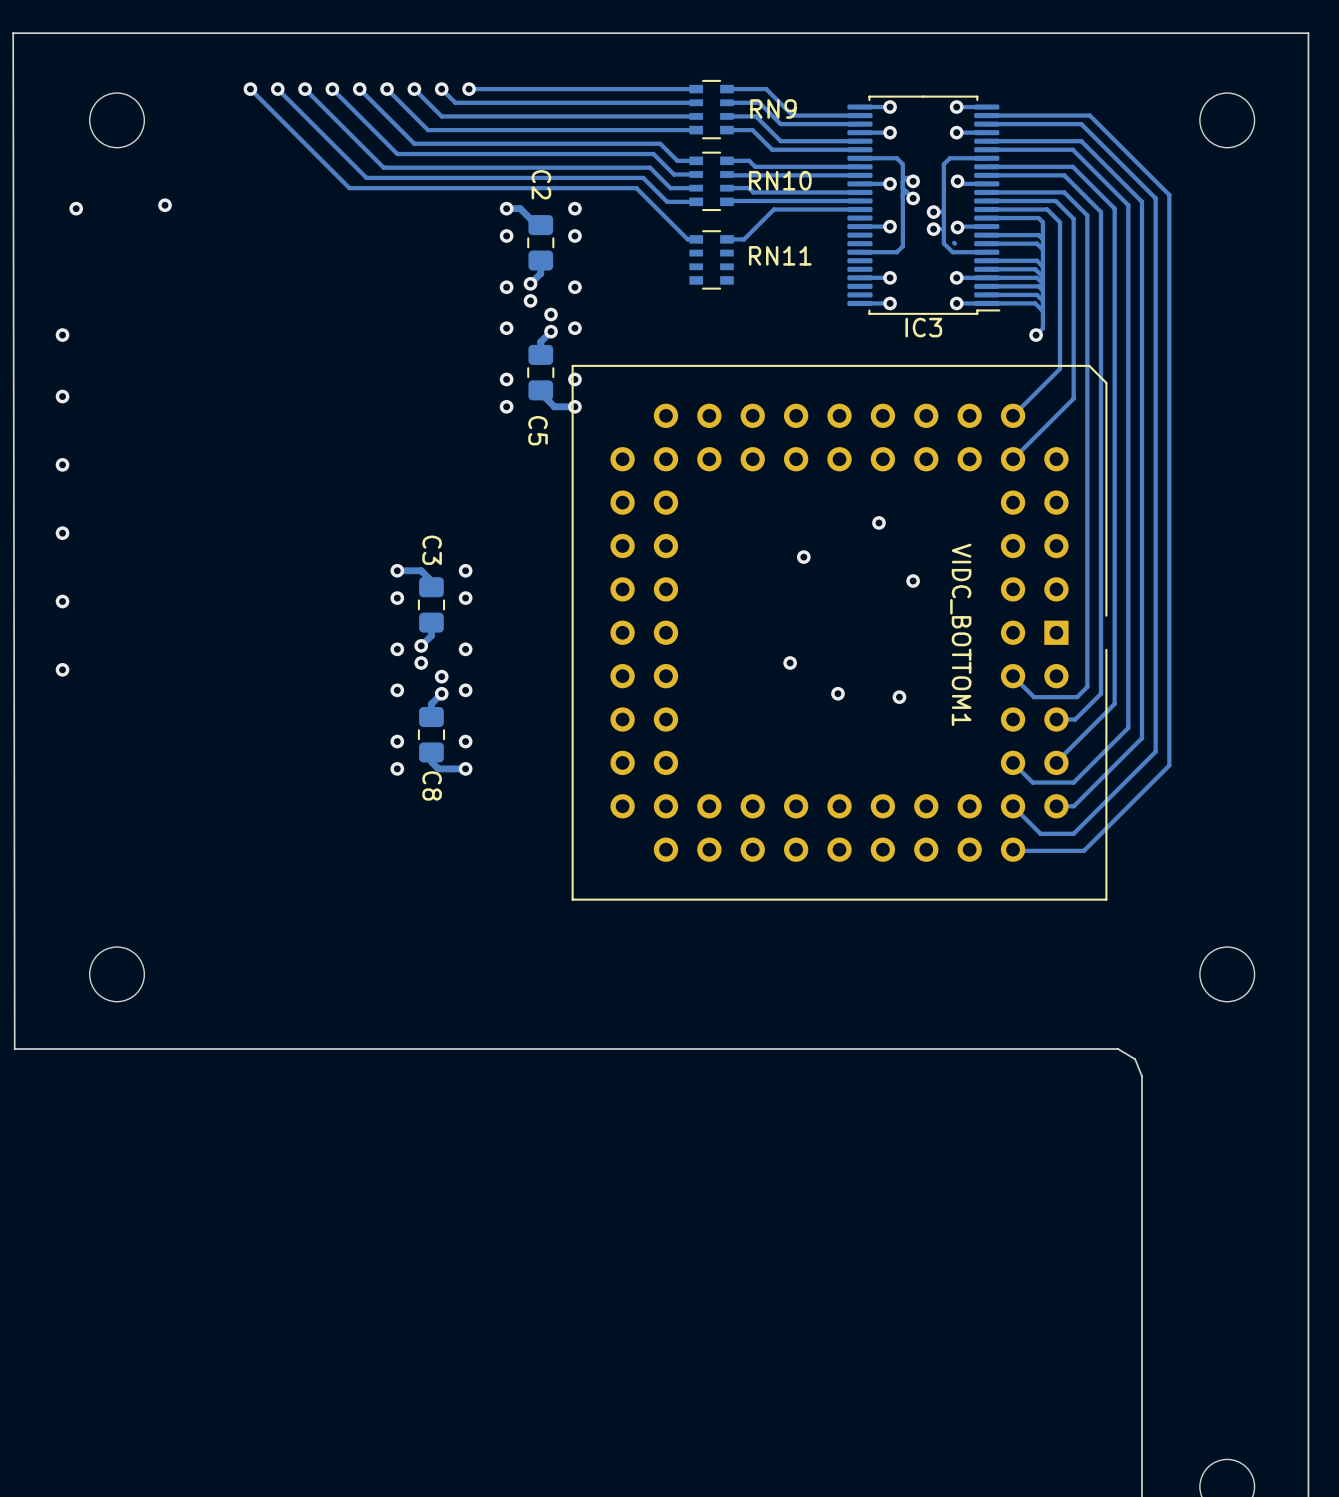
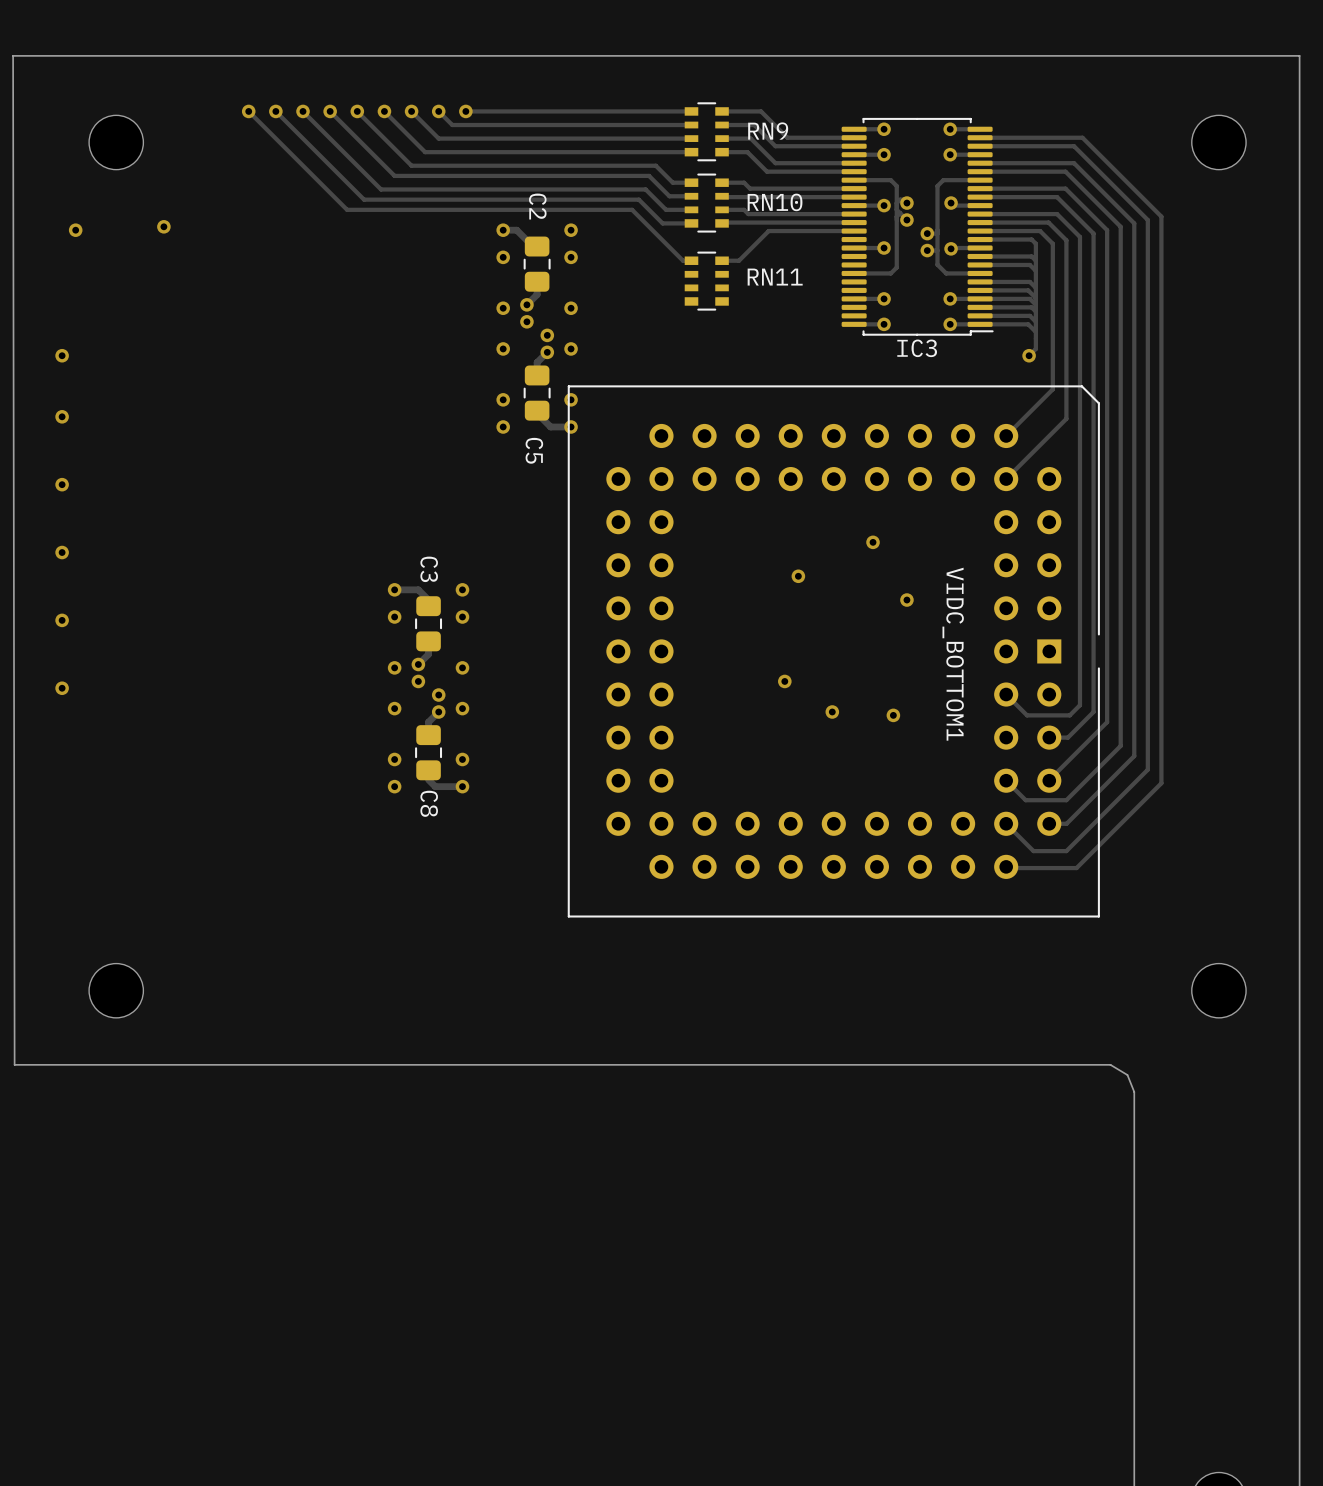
track: (954, 242) (954, 243) -> none

